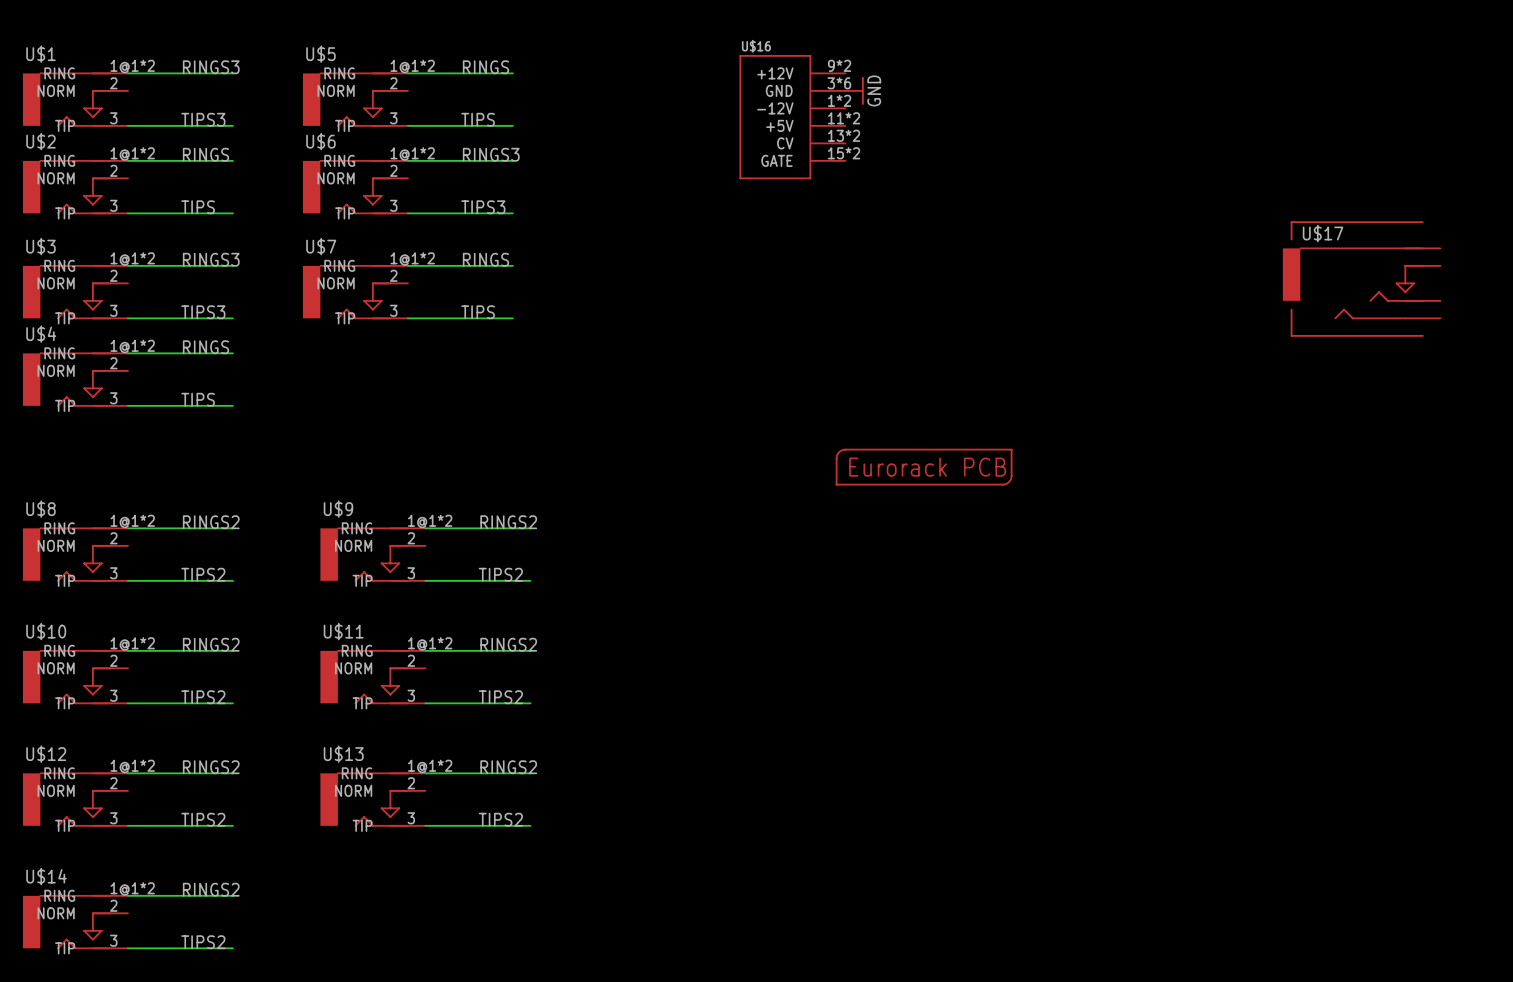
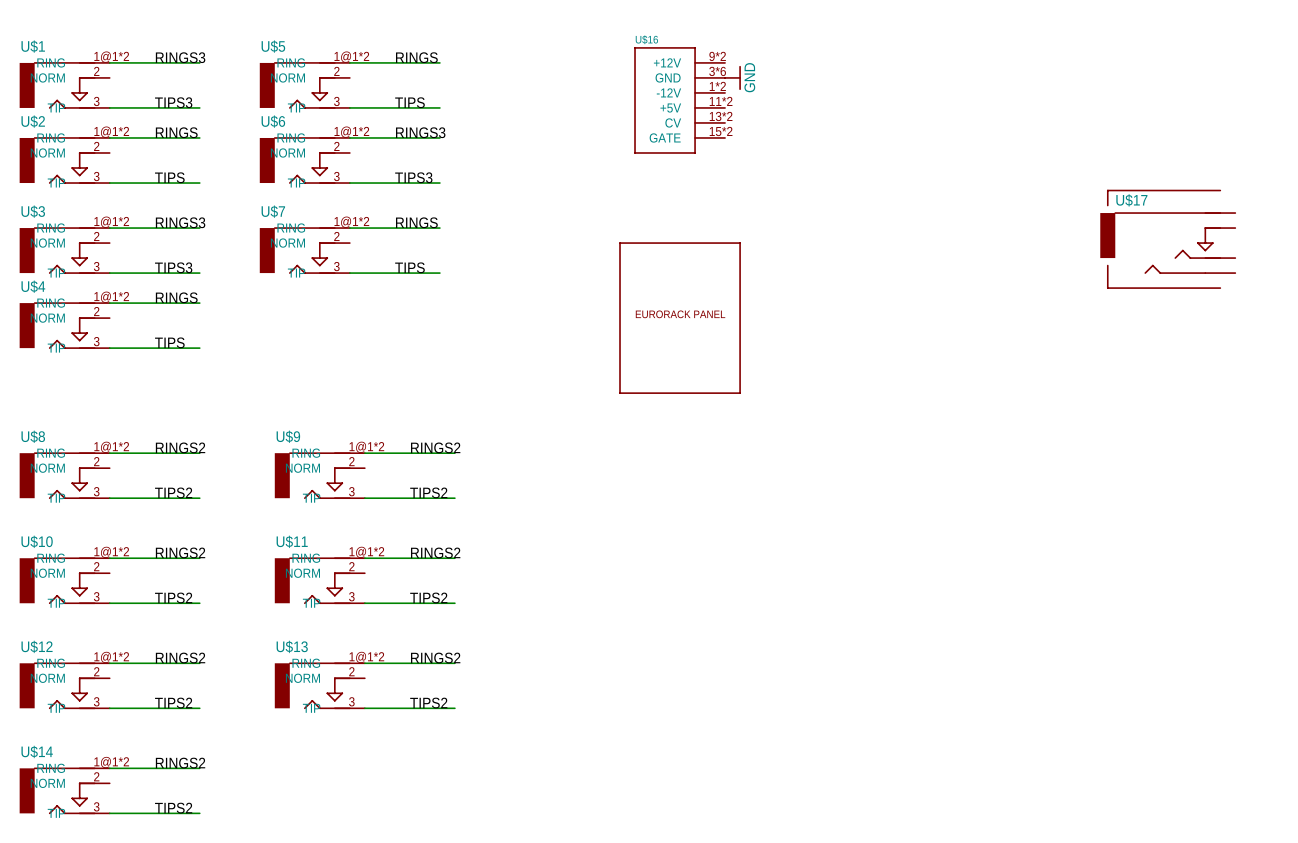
part: none -> (680, 318)
part: (924, 467) -> none

